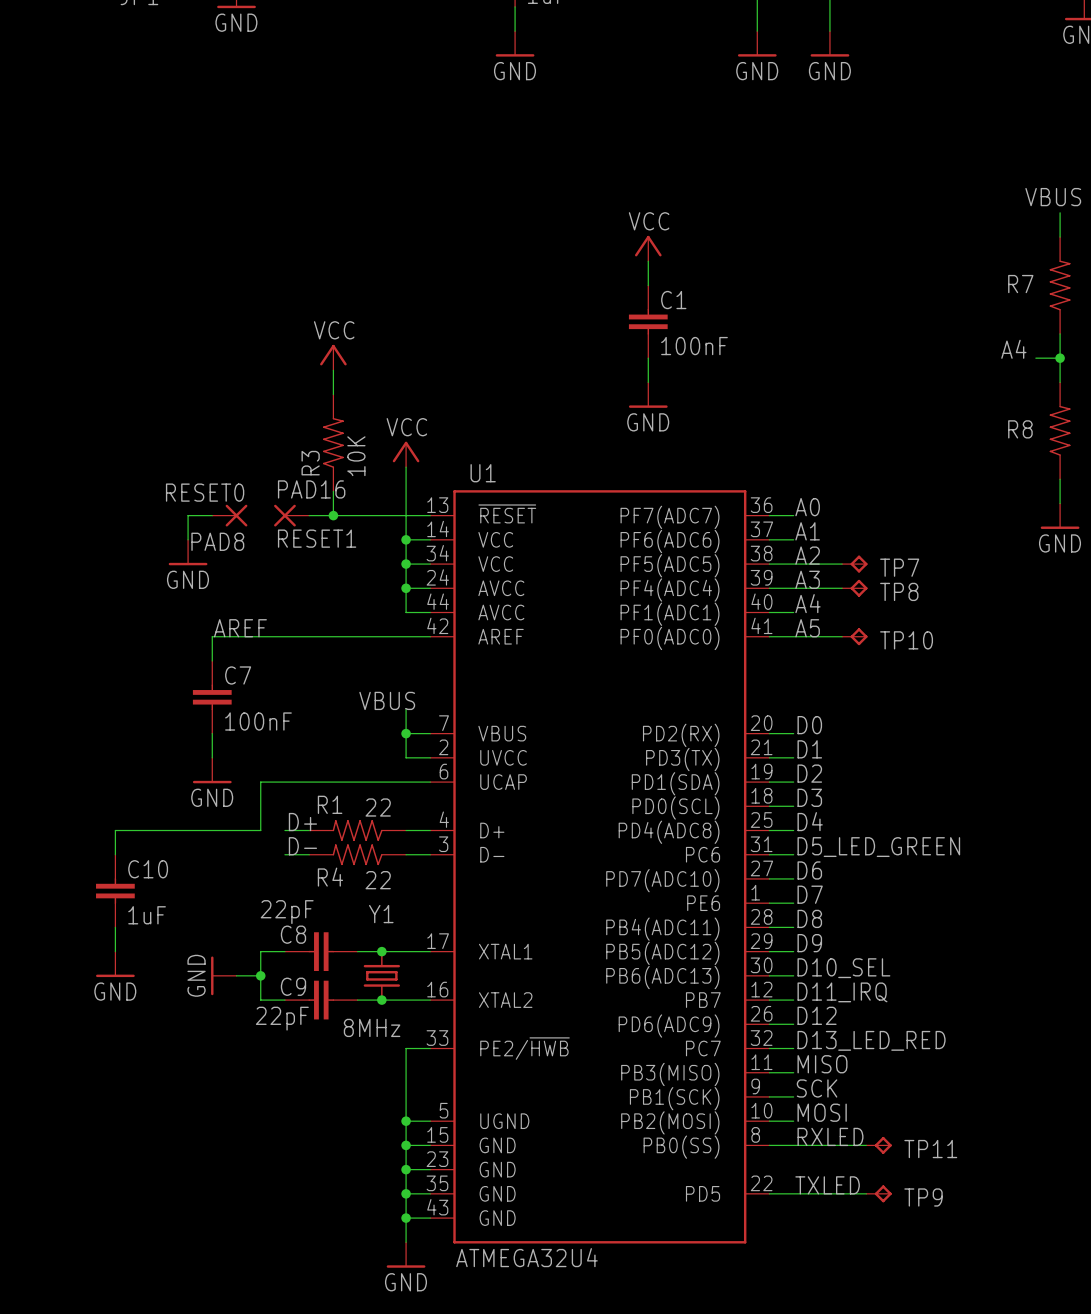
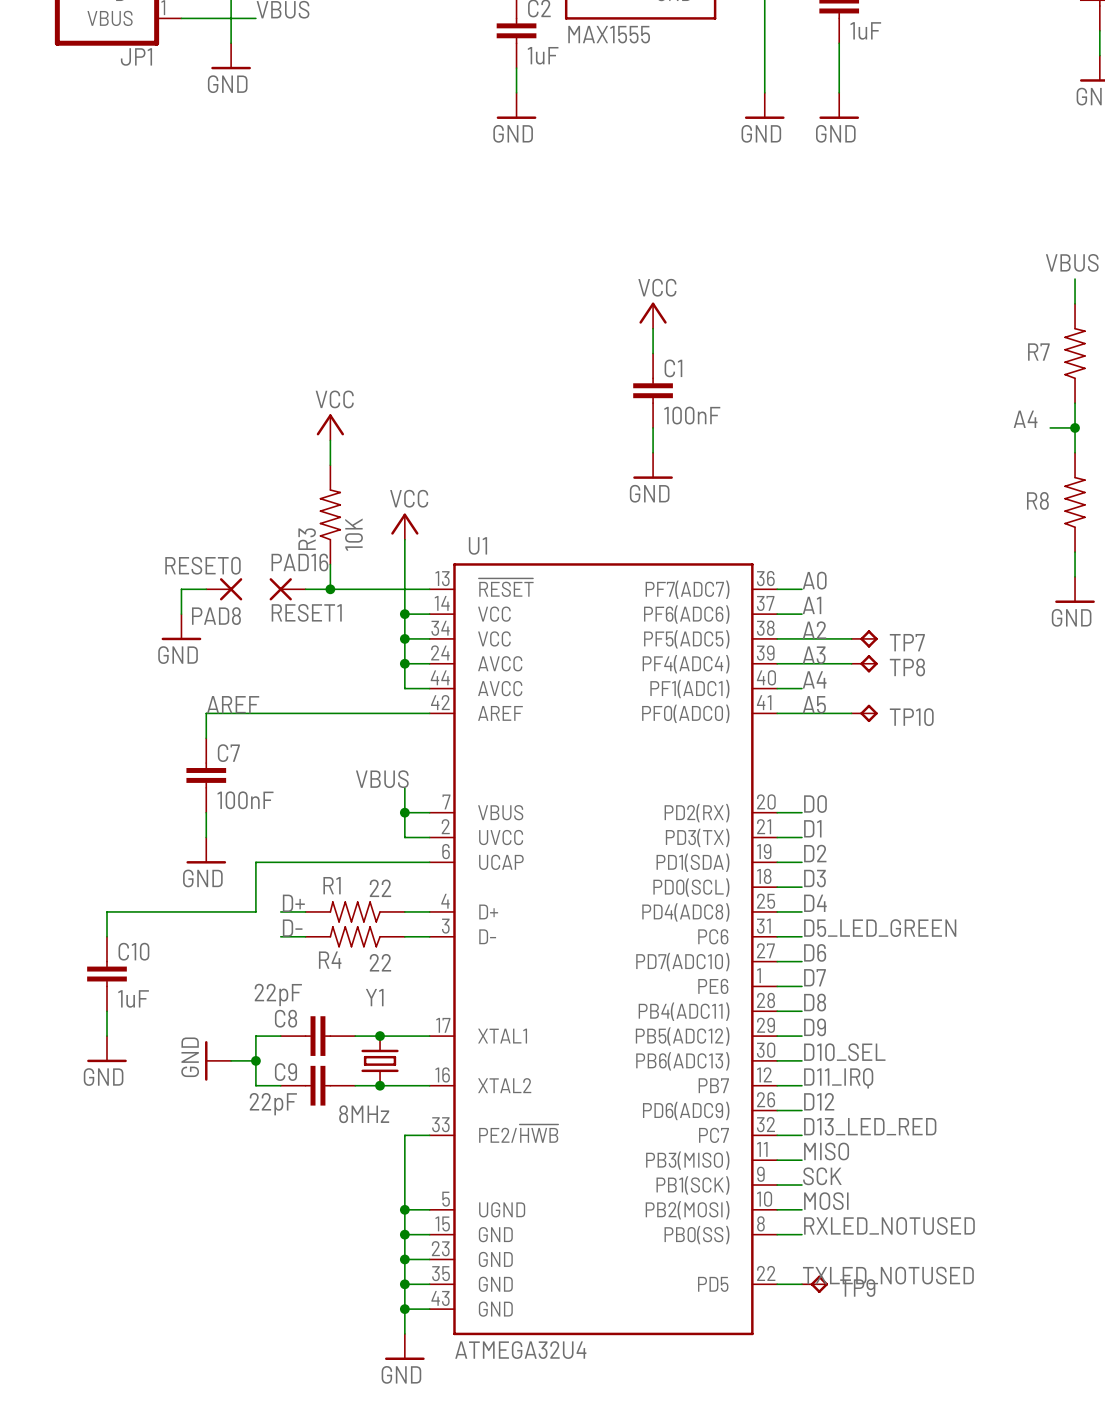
label: RXLED (830, 1136) -> RXLED_NOTUSED (889, 1225)
wire: (793, 1145) (866, 1145) -> none
TP11: (879, 1145) -> none
label: TXLED (827, 1185) -> TXLED_NOTUSED (888, 1275)
TP9 position: (879, 1193) -> (815, 1284)

